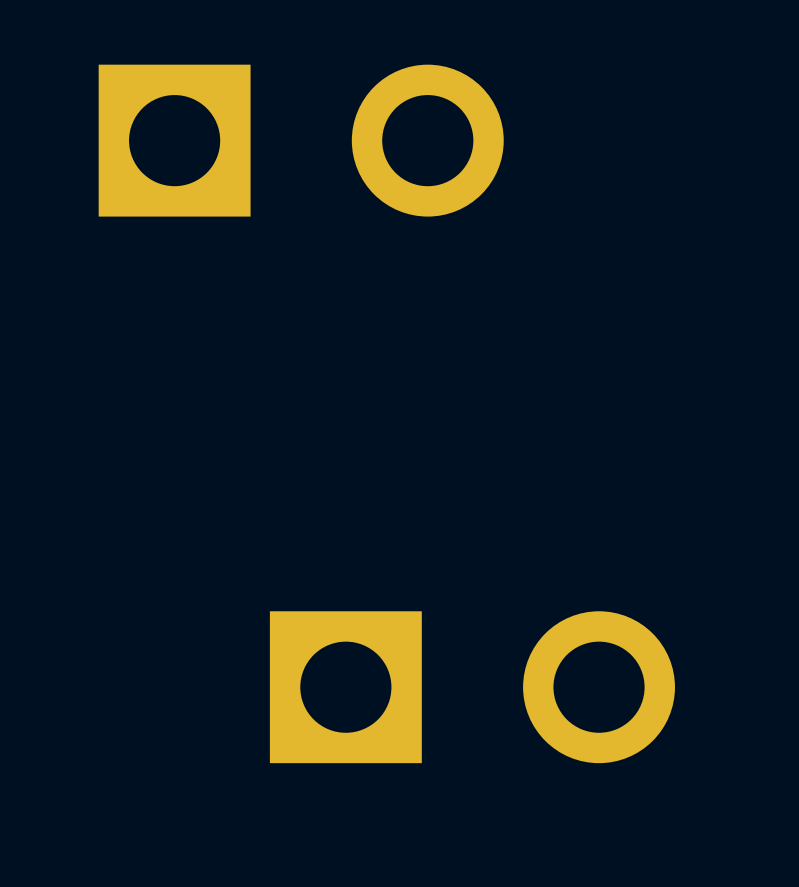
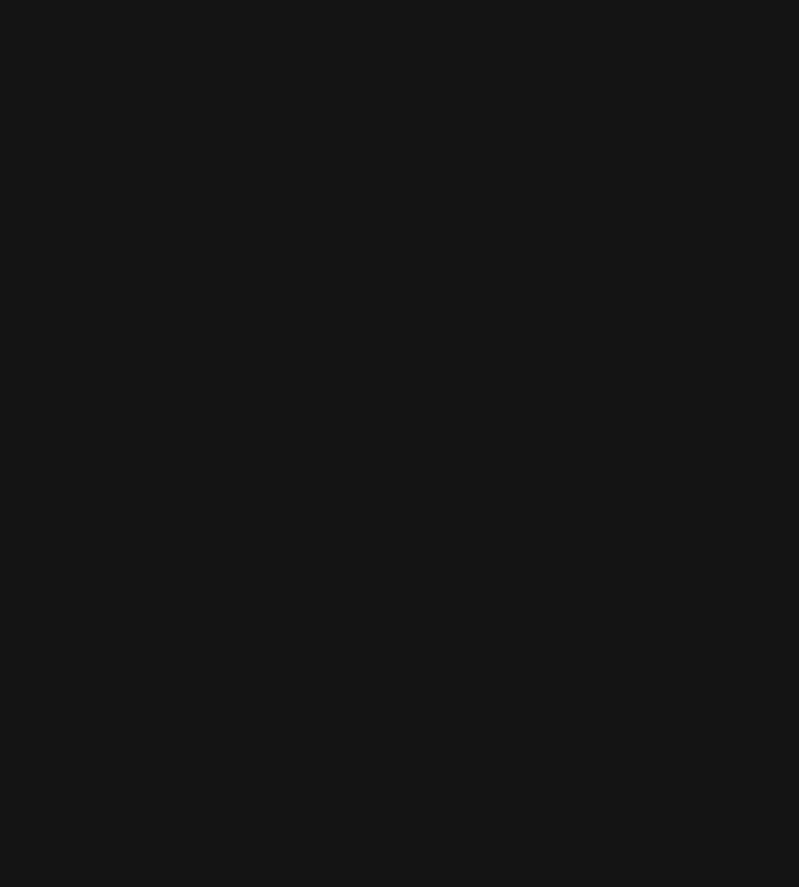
part: (301, 140) -> none
part: (472, 687) -> none

